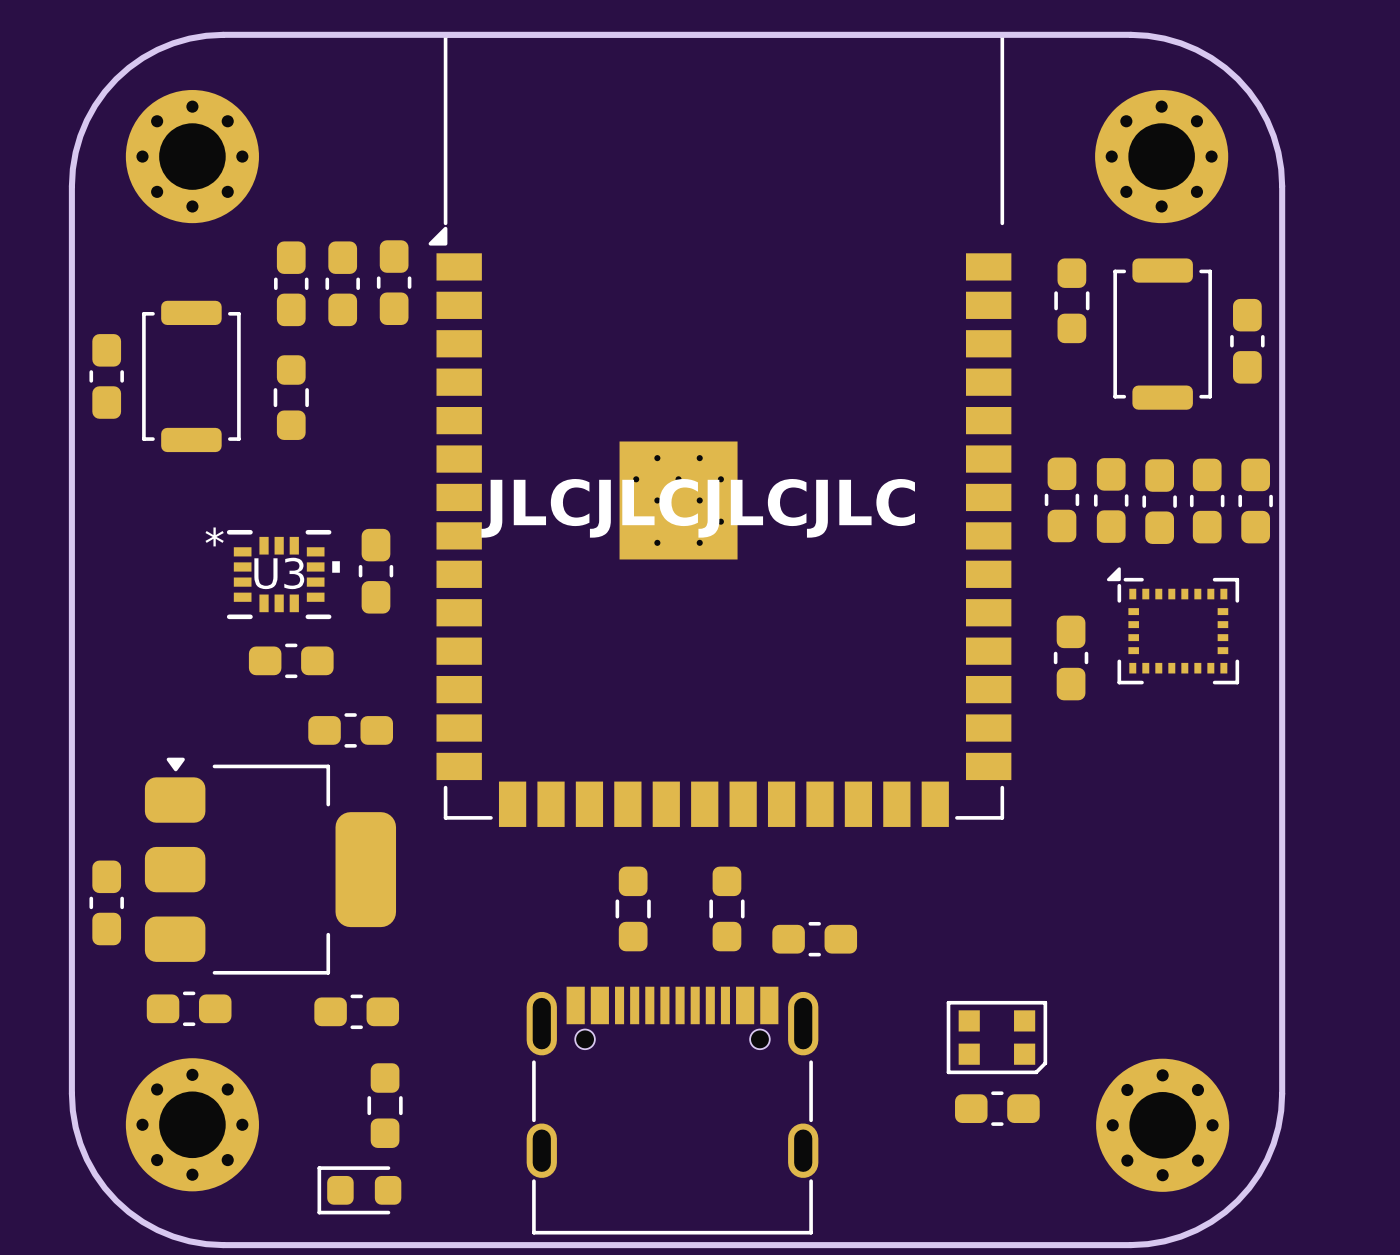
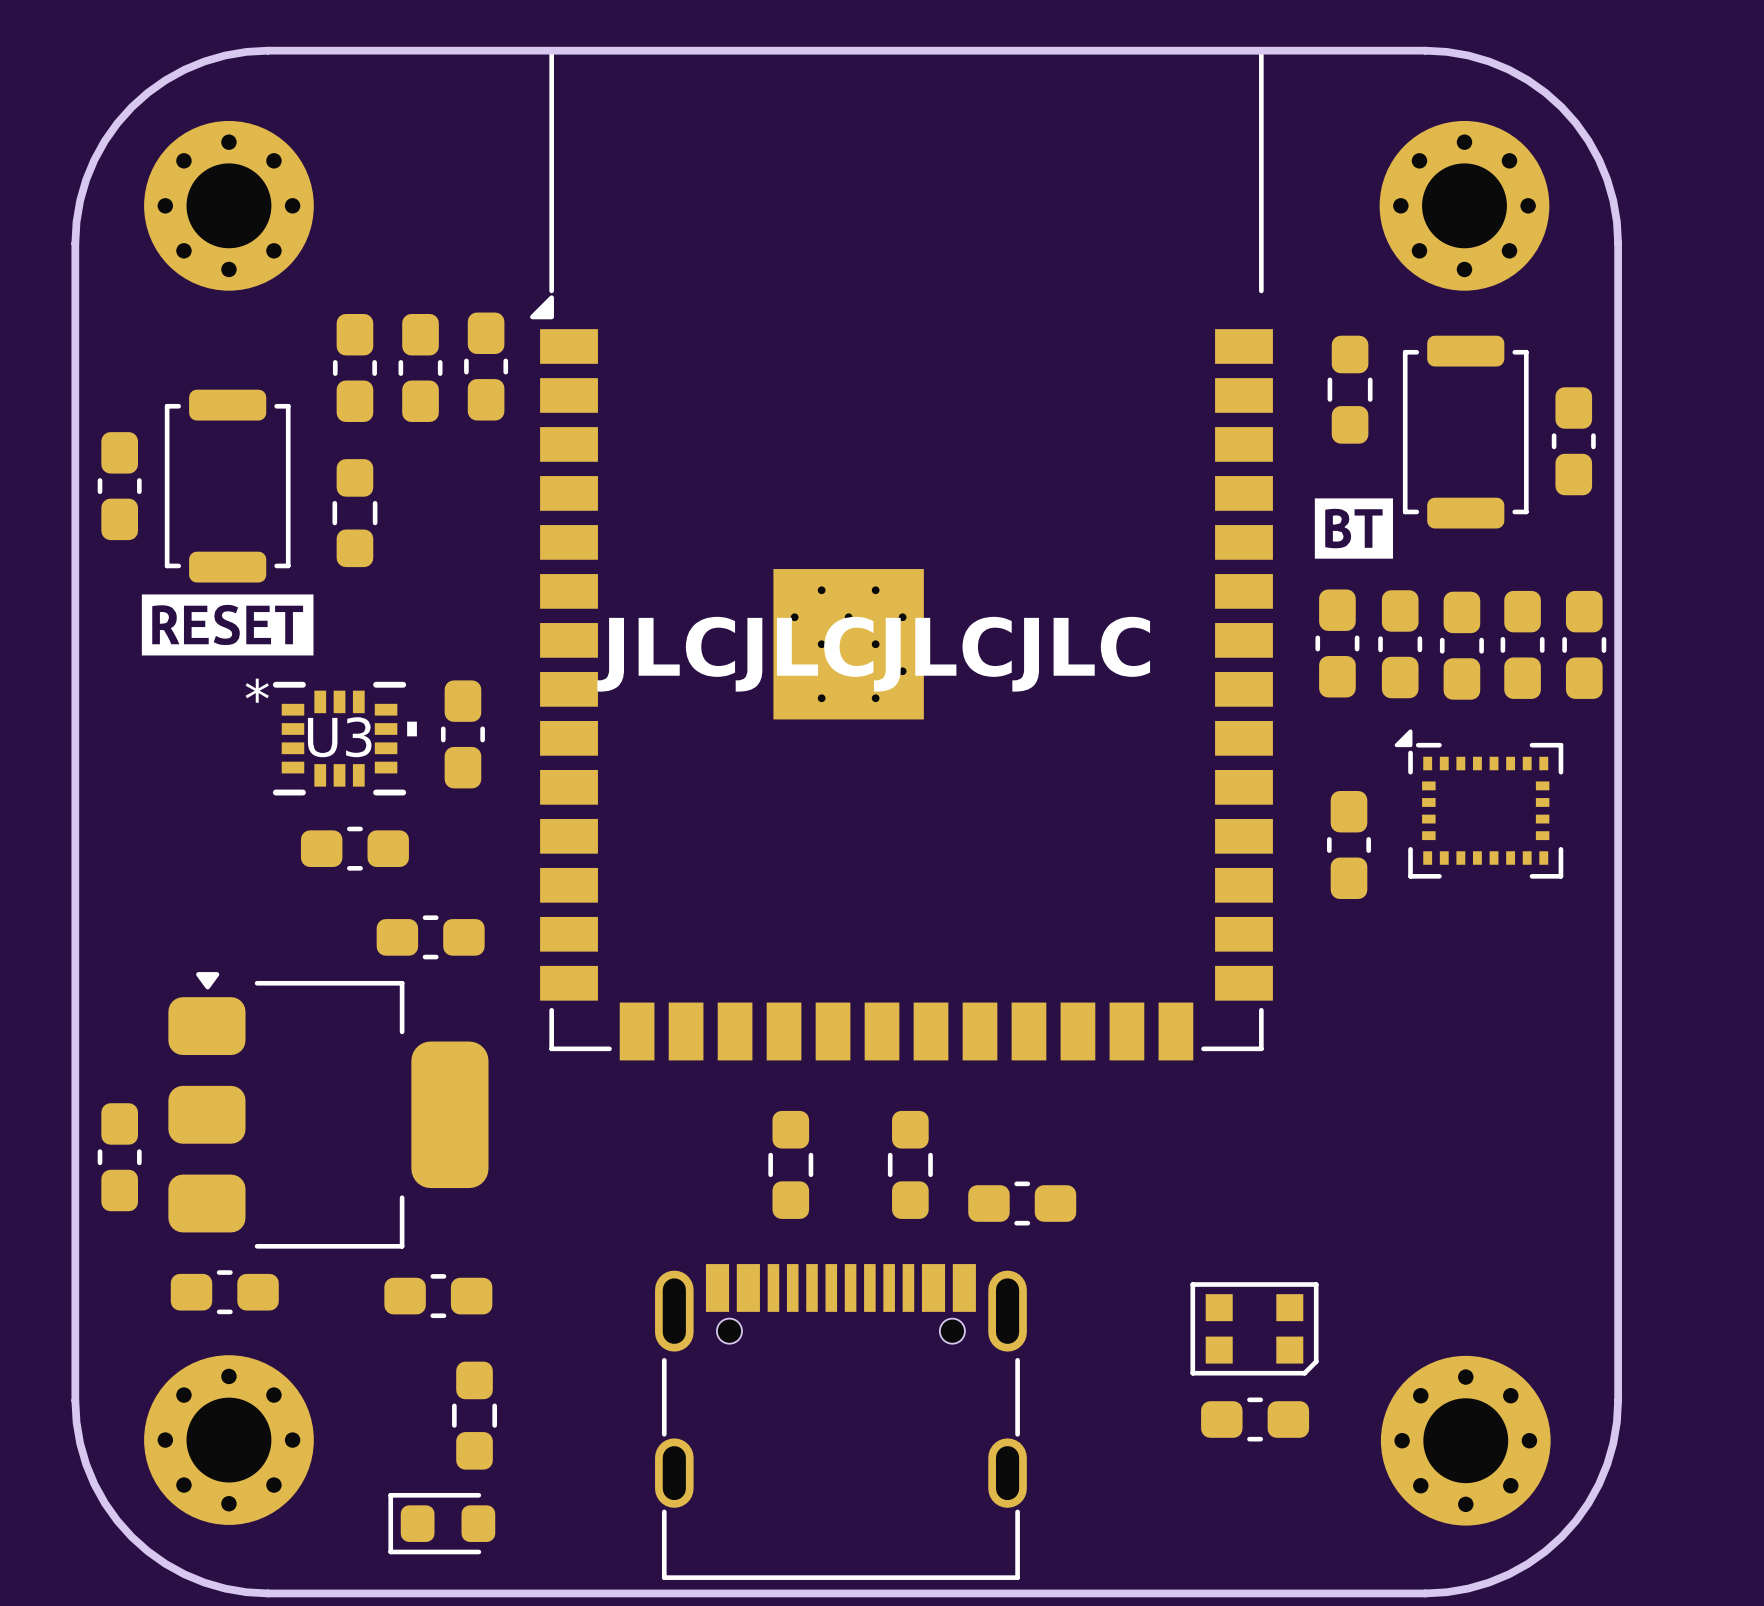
drawing: none -> [1314, 498, 1394, 559]
drawing: none -> [141, 594, 314, 656]

